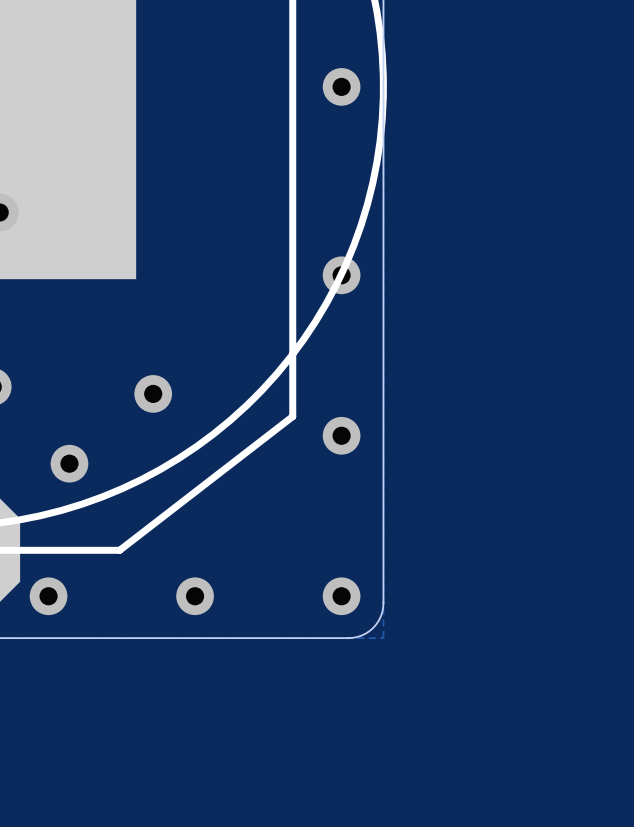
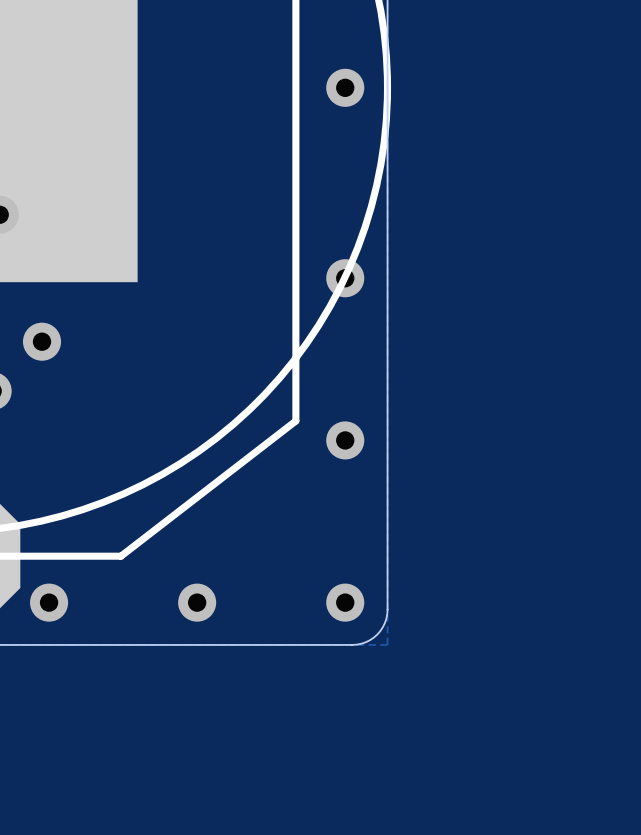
via: none -> (42, 341)
via: (153, 393) -> none
via: (69, 463) -> none

